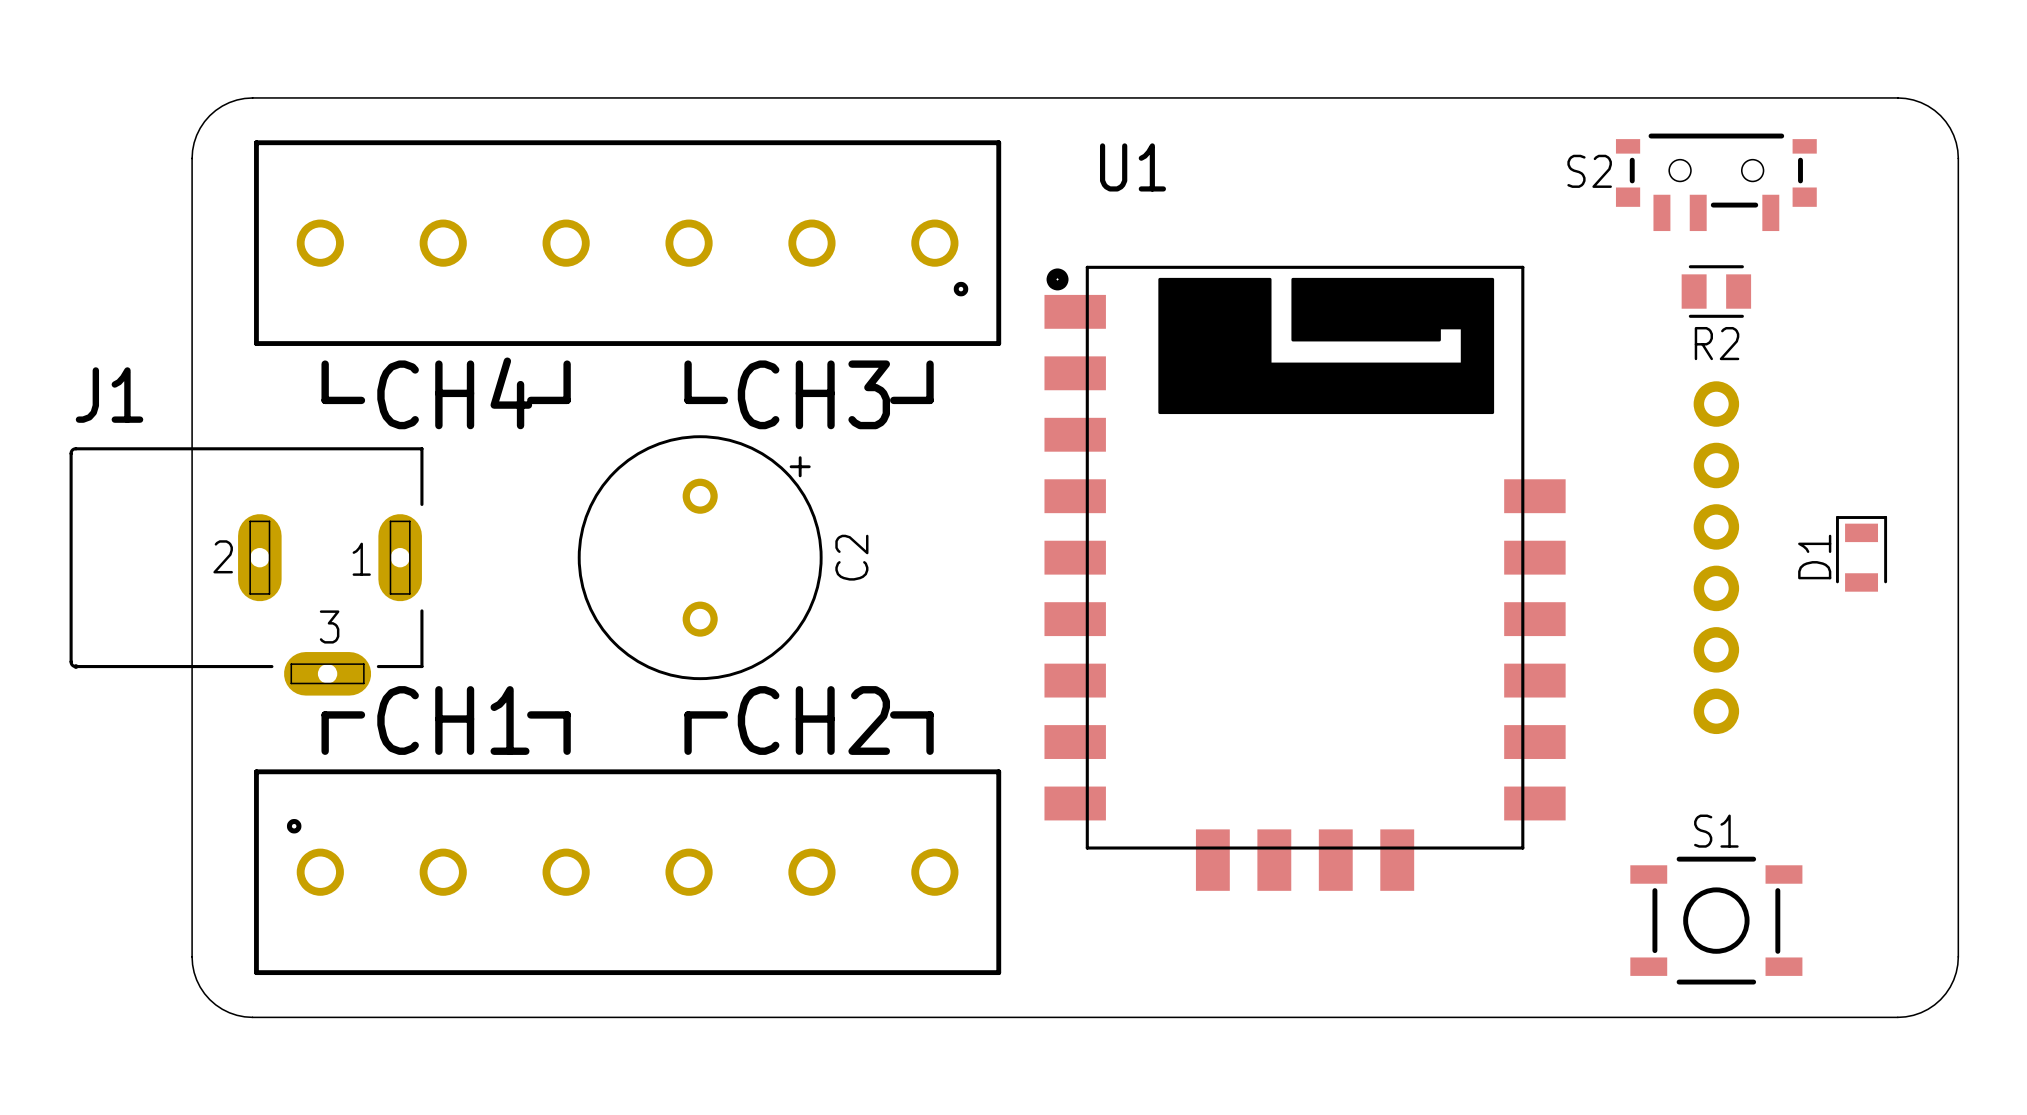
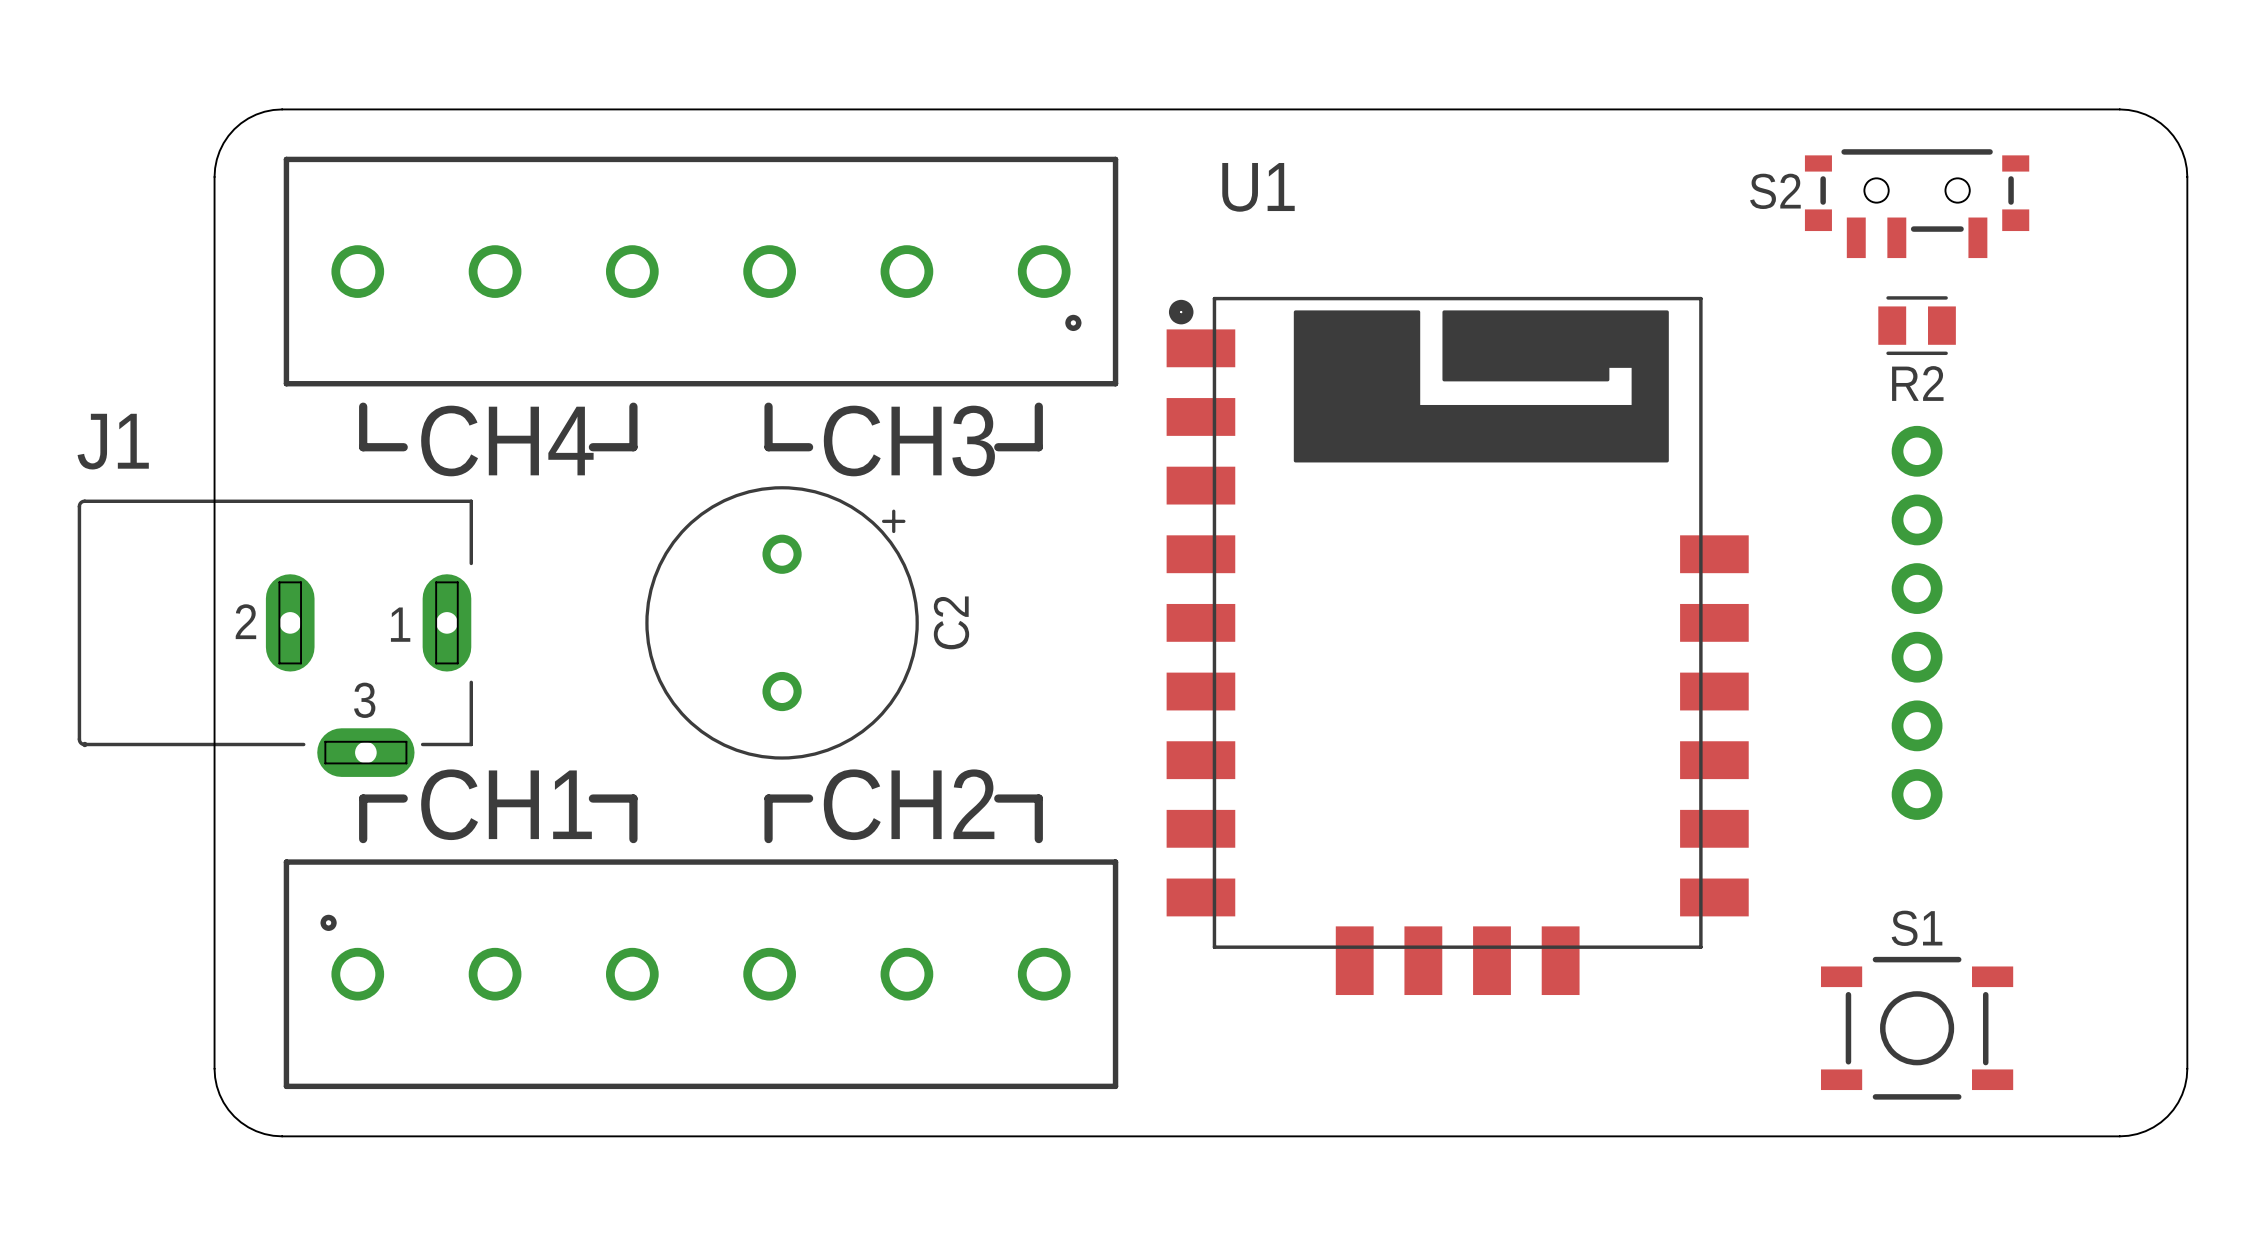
D1: (1861, 553) -> none

